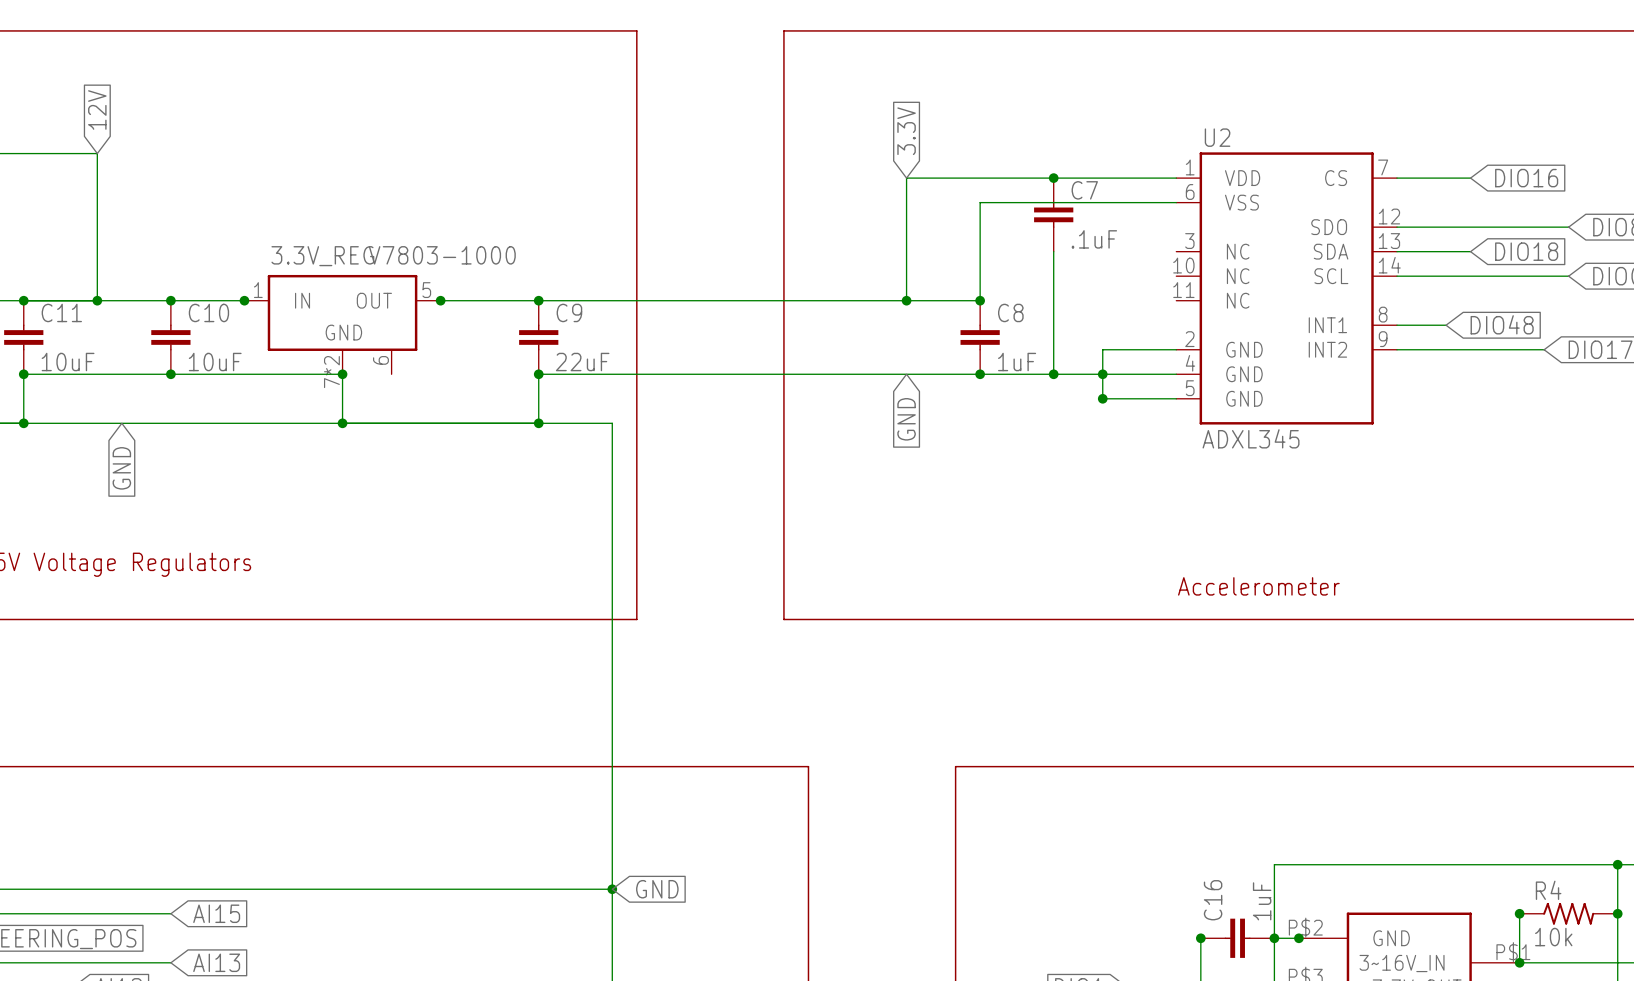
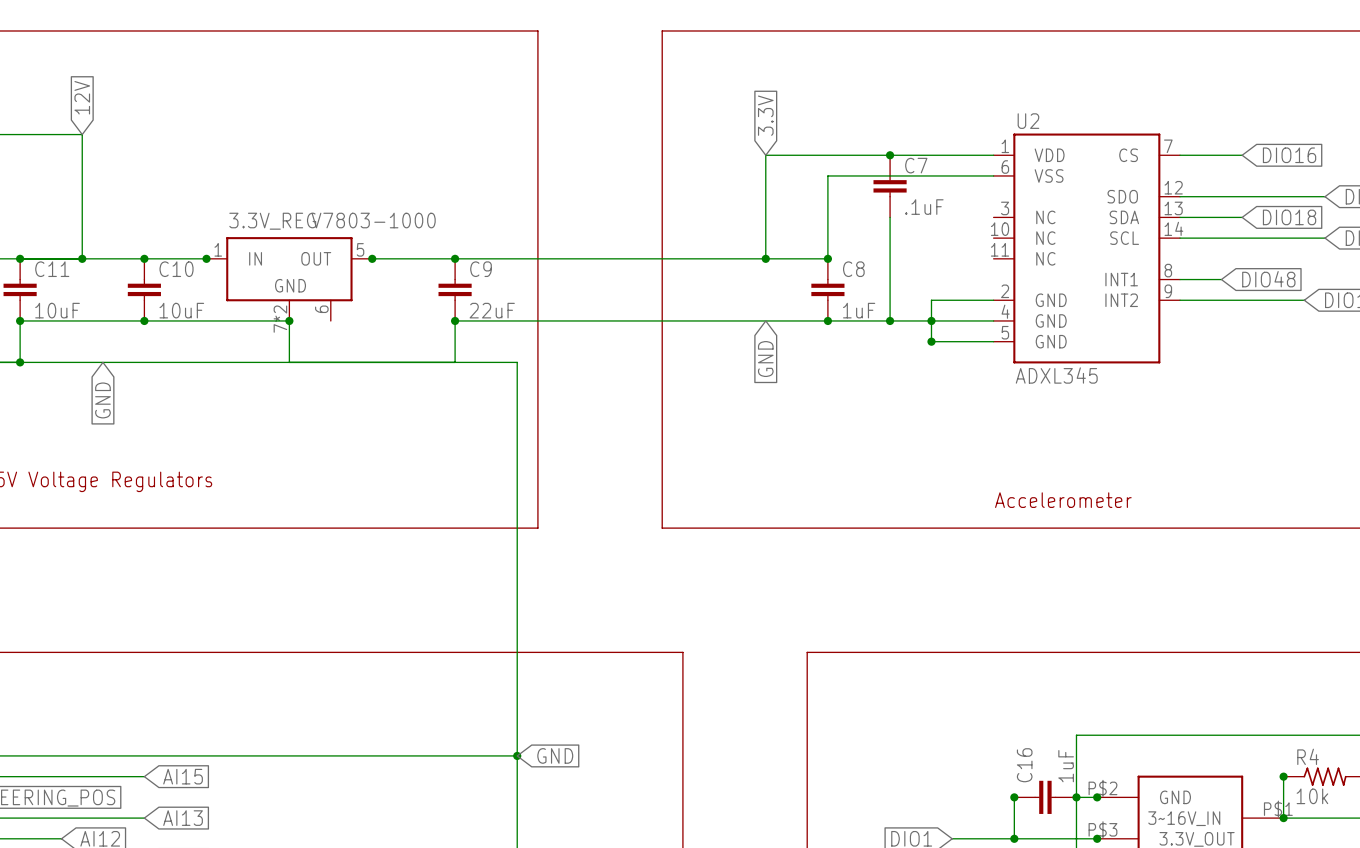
junction: (342, 423) -> none
junction: (538, 423) -> none

